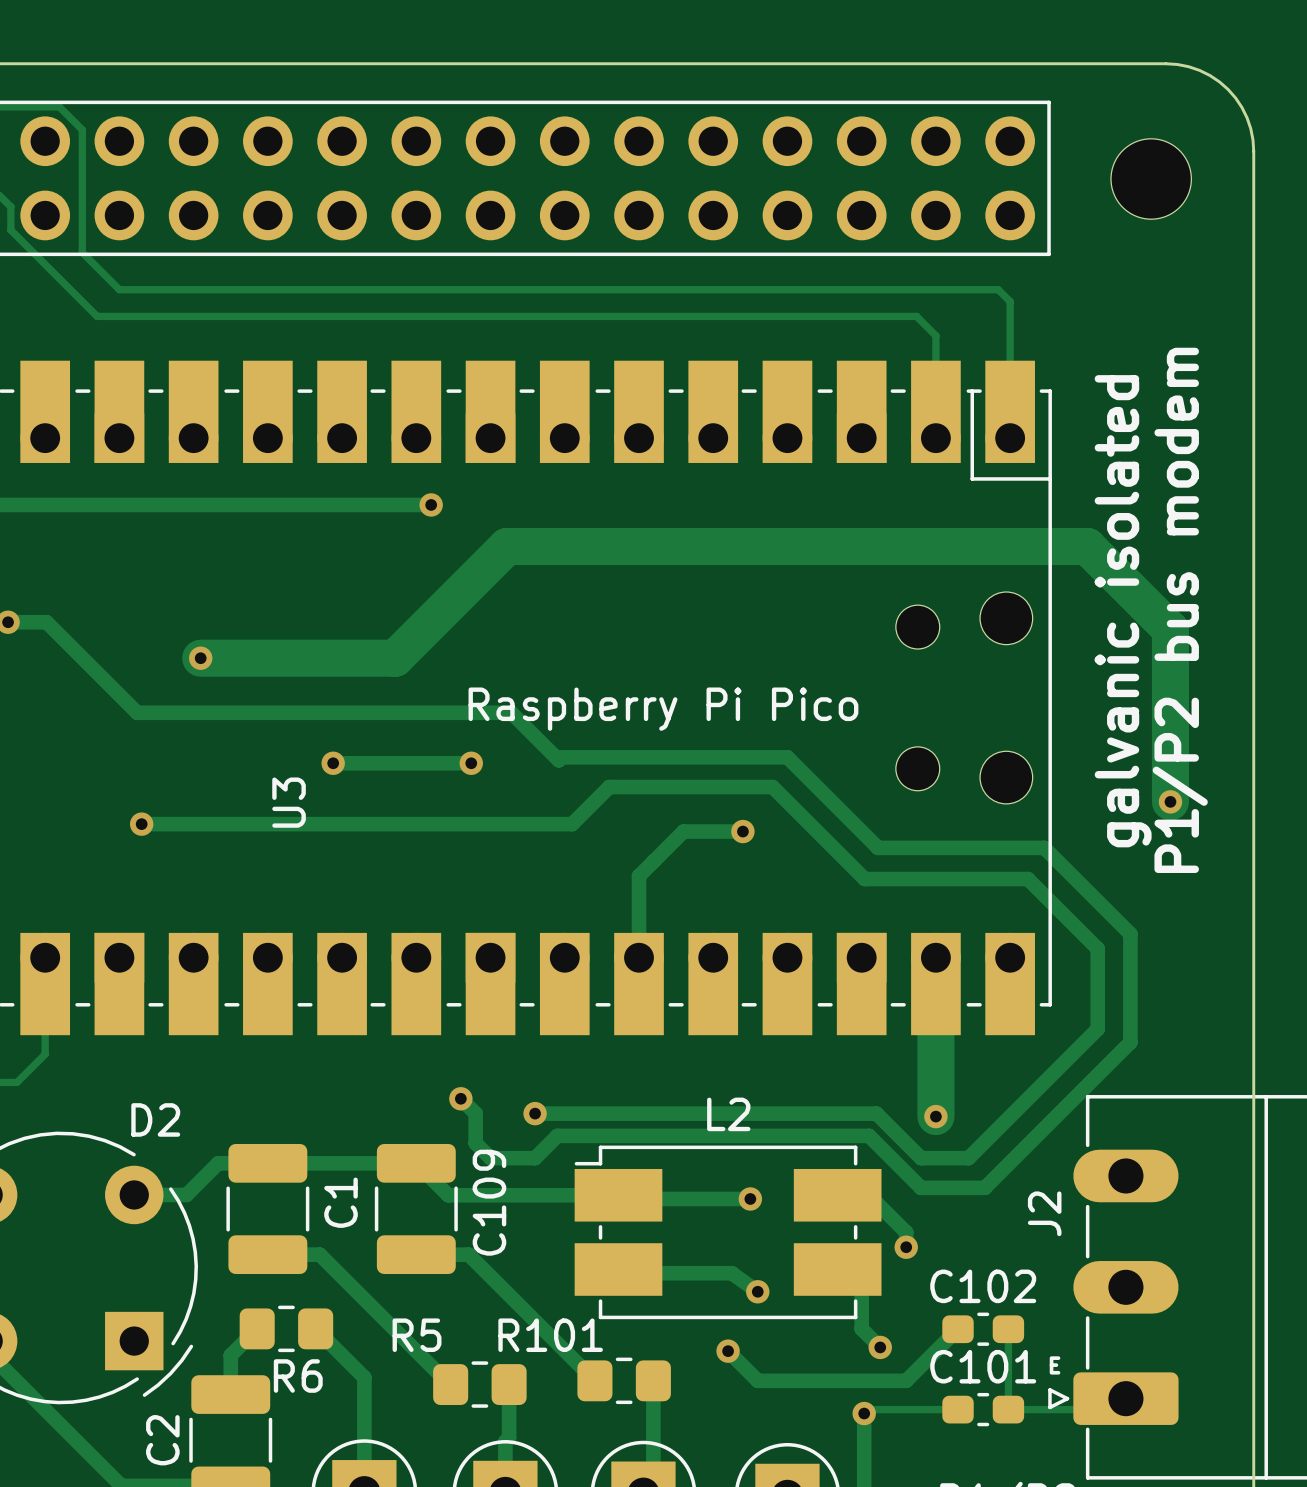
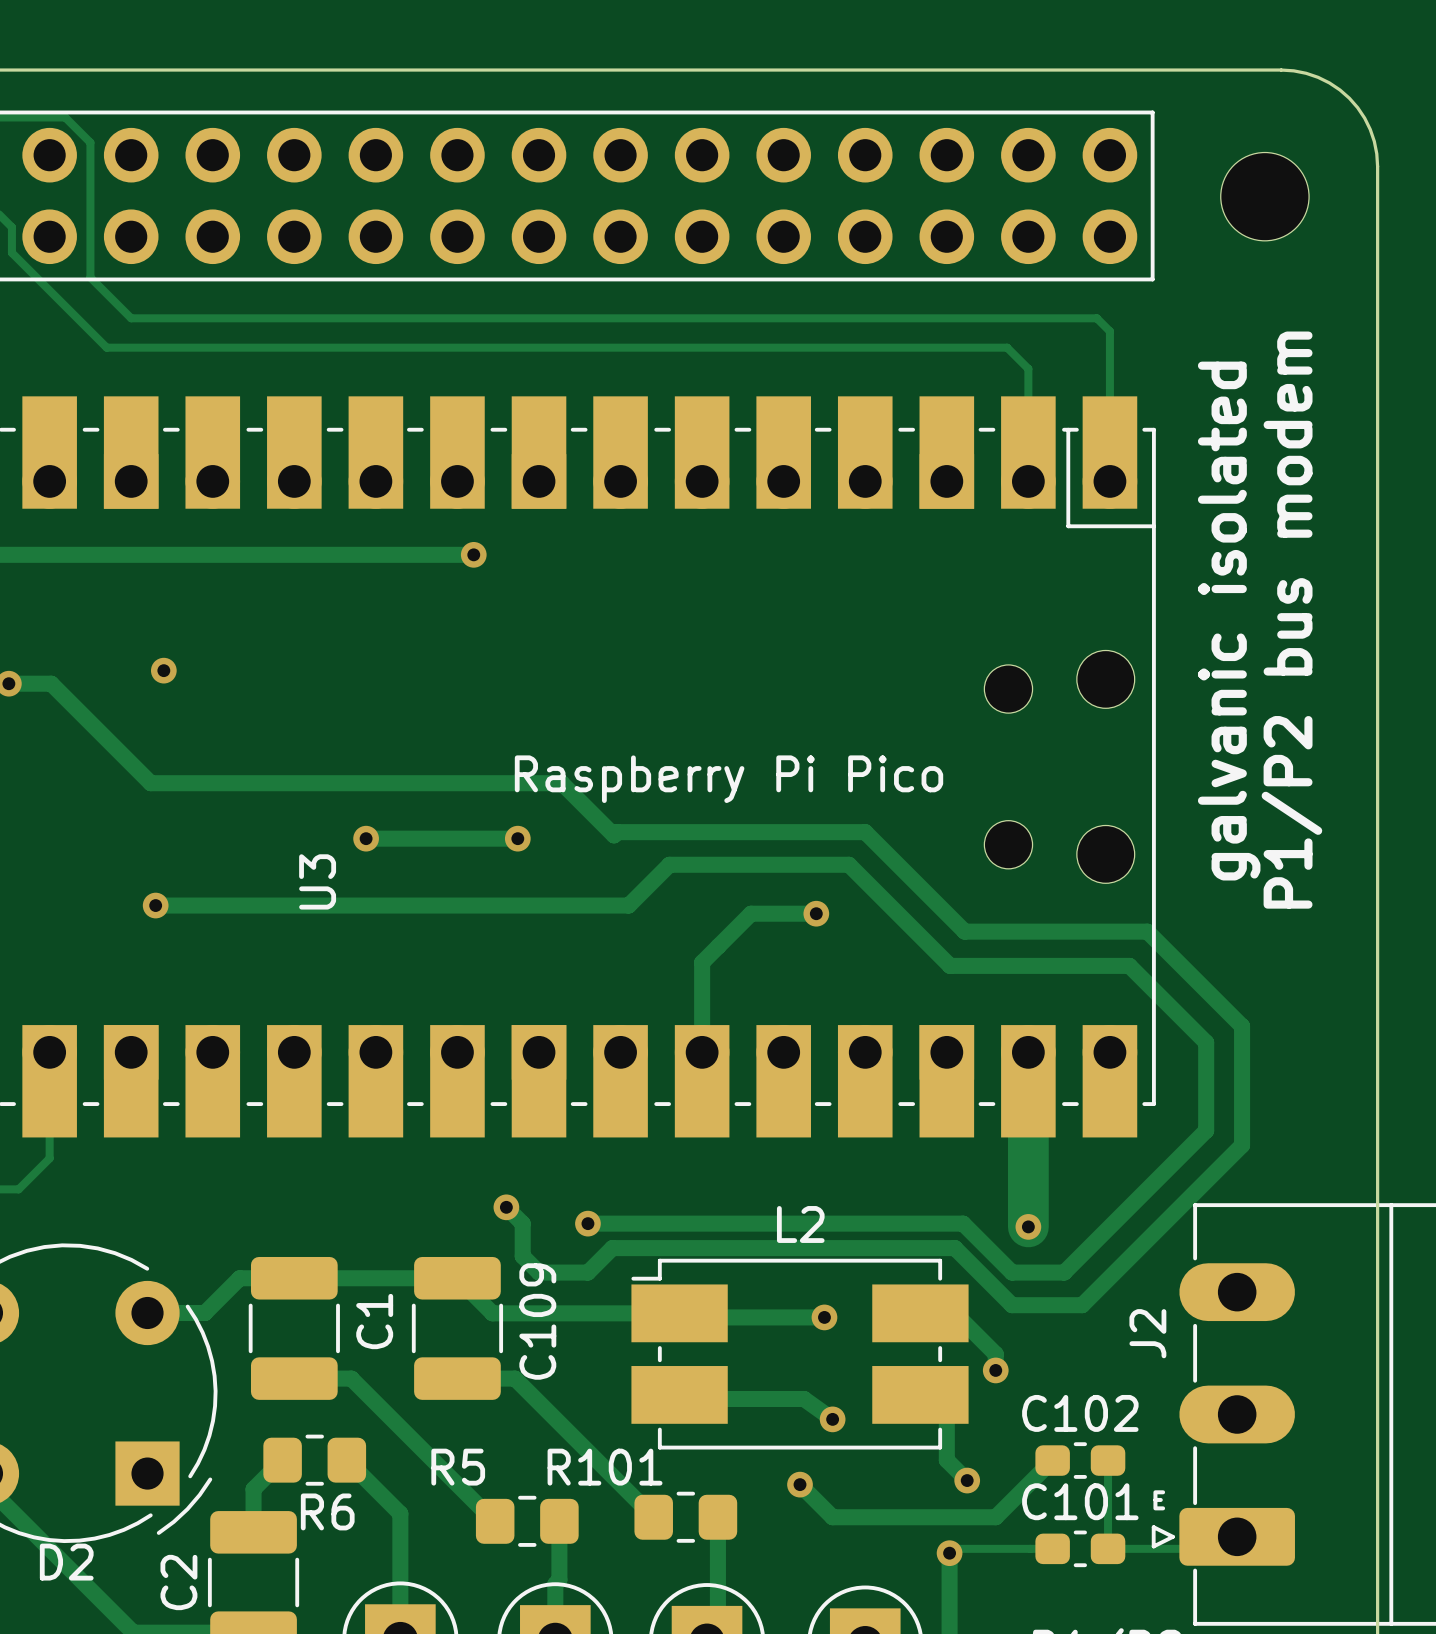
text position: P1/P2 bus modem (1180, 610) -> P1/P2 bus modem (1291, 620)
text position: galvanic isolated (1123, 611) -> galvanic isolated (1229, 621)
track: (200, 658) (395, 658) (506, 546) (1087, 546) (1170, 629) (1170, 801) -> none
via position: (200, 658) -> (163, 670)
via: (1170, 801) -> none
D2 name position: D2 (155, 1119) -> D2 (66, 1562)

